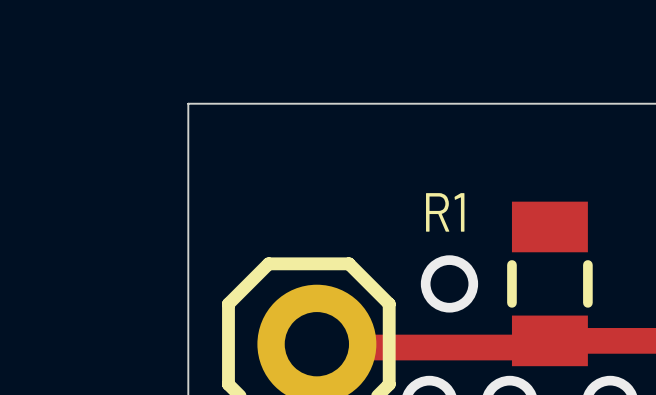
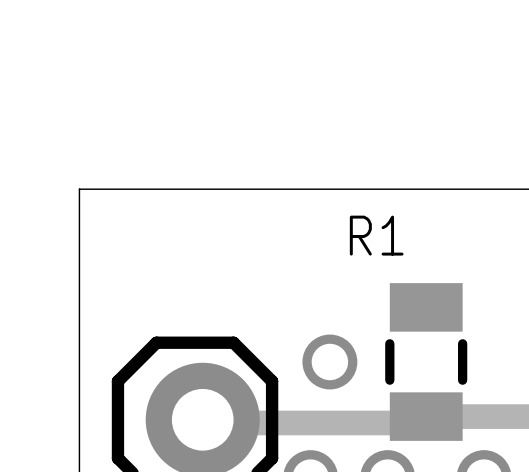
R1 name position: R1 (445, 212) -> R1 (376, 235)

